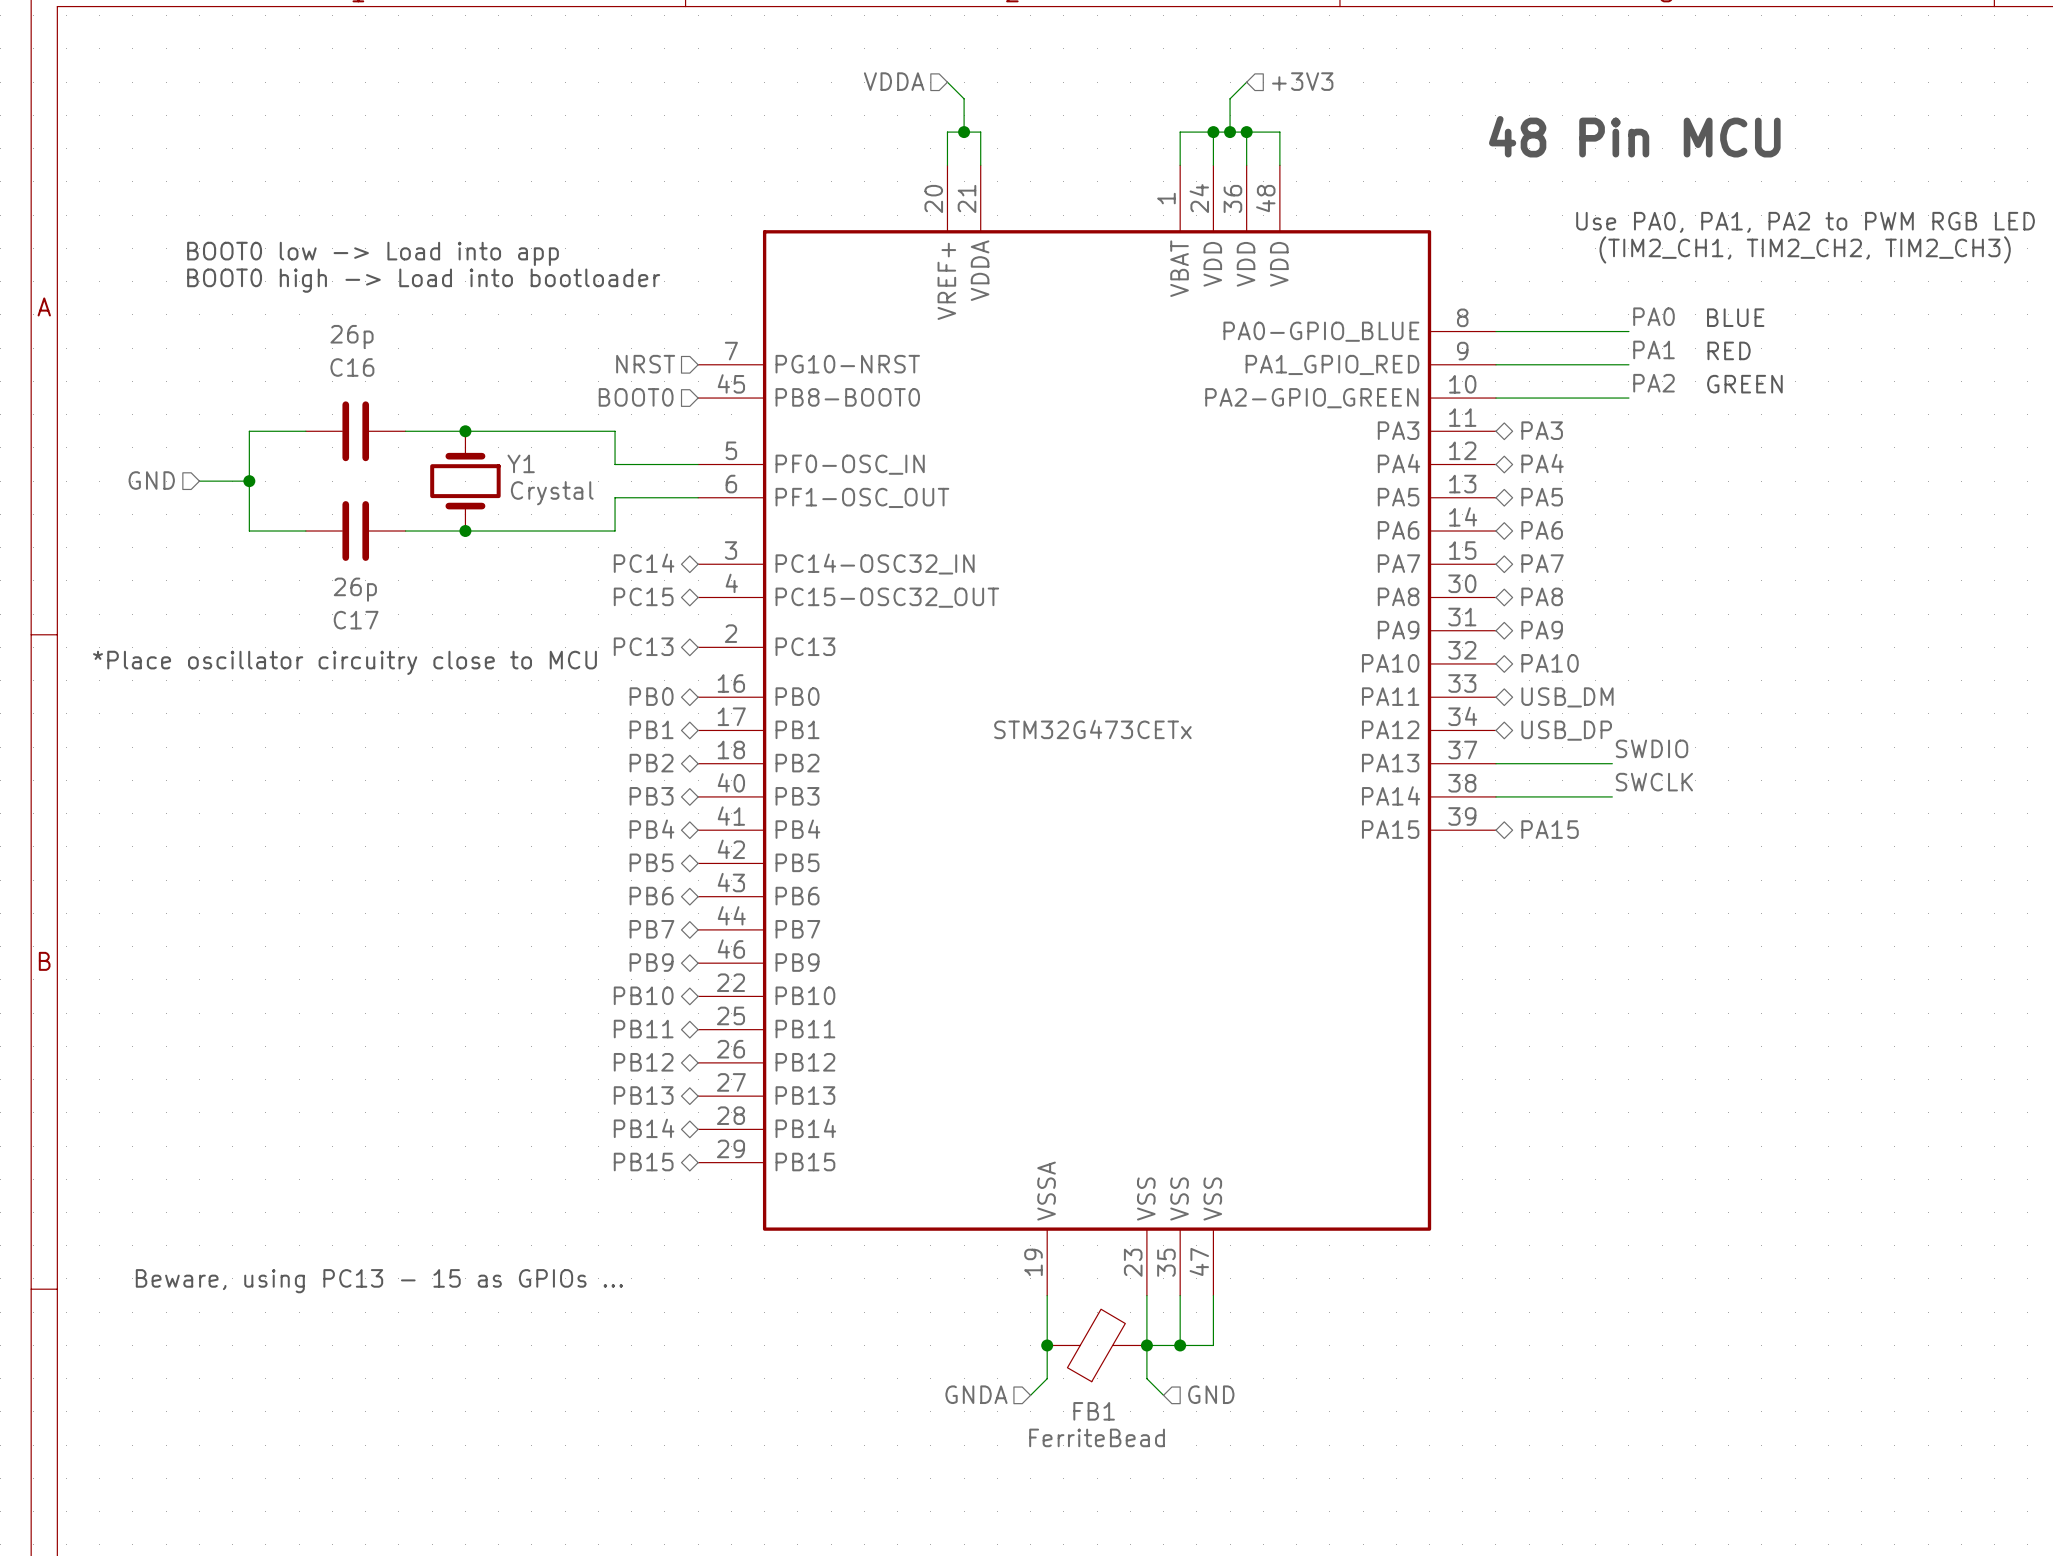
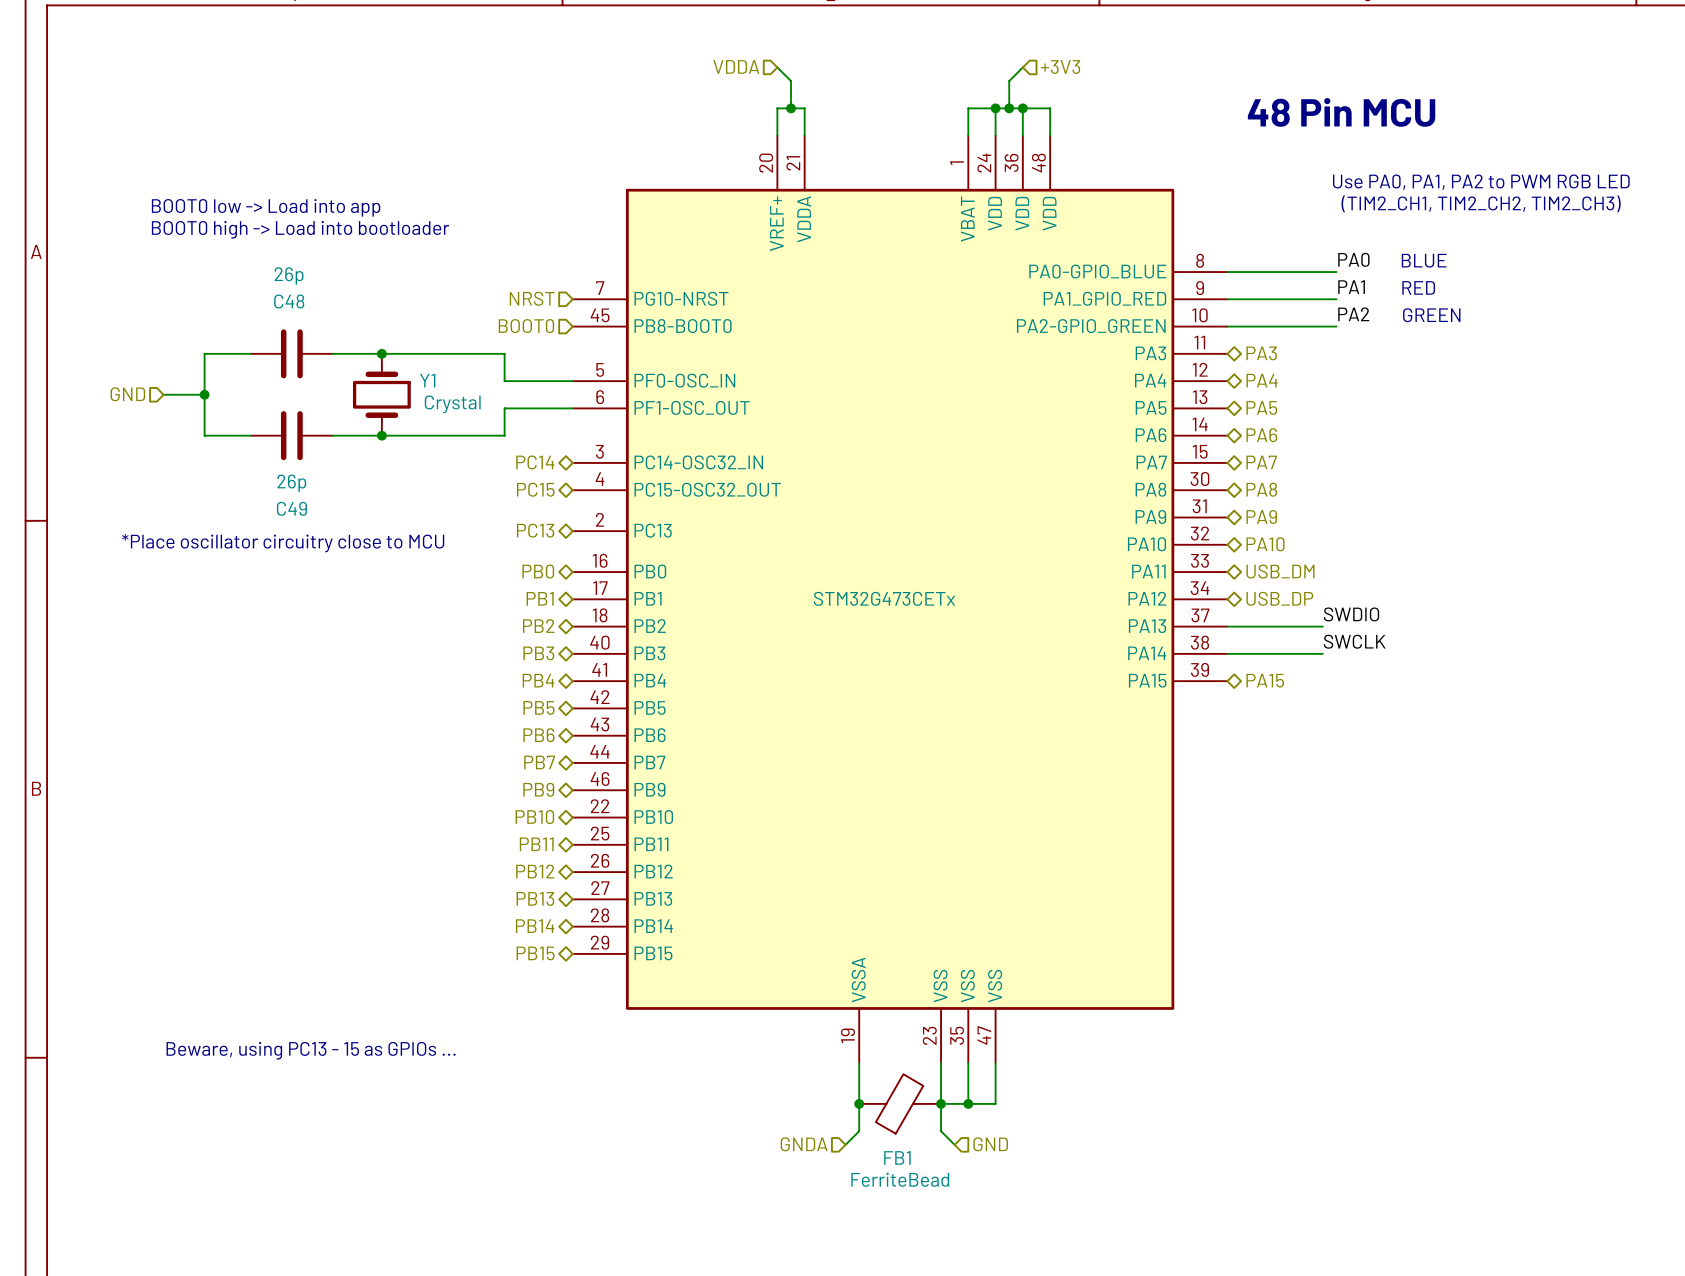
C16 name: C16 (352, 367) -> C48 (289, 301)
C17 name: C17 (356, 620) -> C49 (291, 508)

